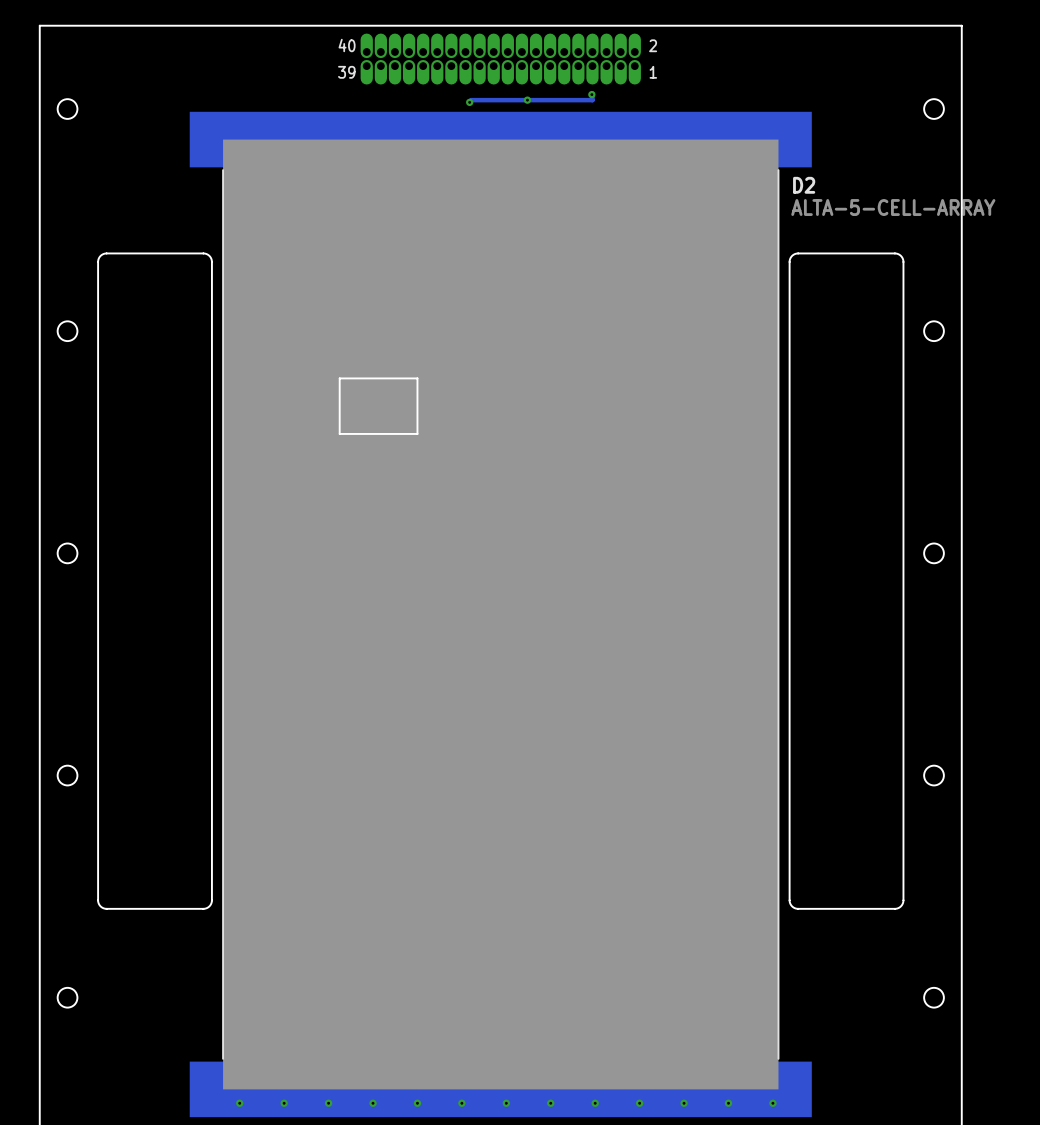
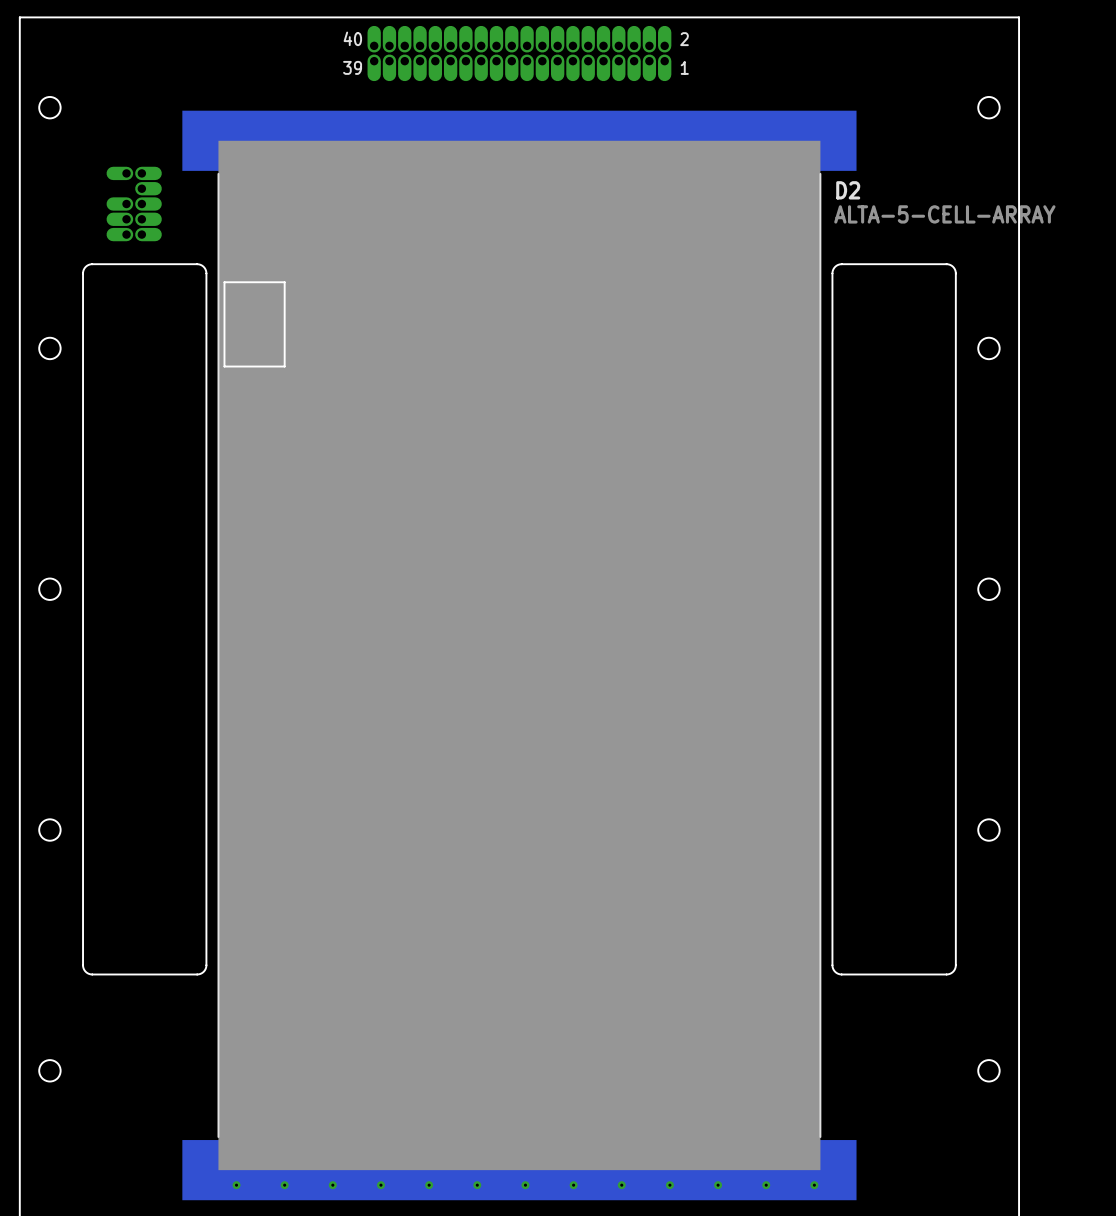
track: (592, 93) (592, 100) (471, 100) (469, 102) -> none
via: (591, 94) -> none
via: (527, 100) -> none
via: (469, 102) -> none
part: none -> (134, 204)
part rotation: 0° (378, 406) -> 90° clockwise (254, 324)
part position: (378, 406) -> (254, 324)

